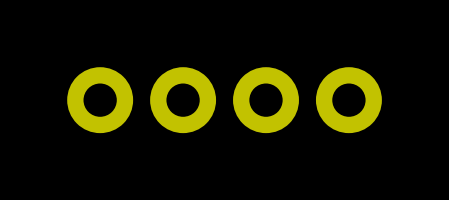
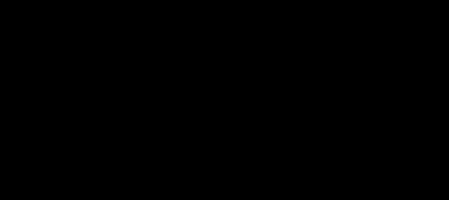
part: (224, 100) -> none

